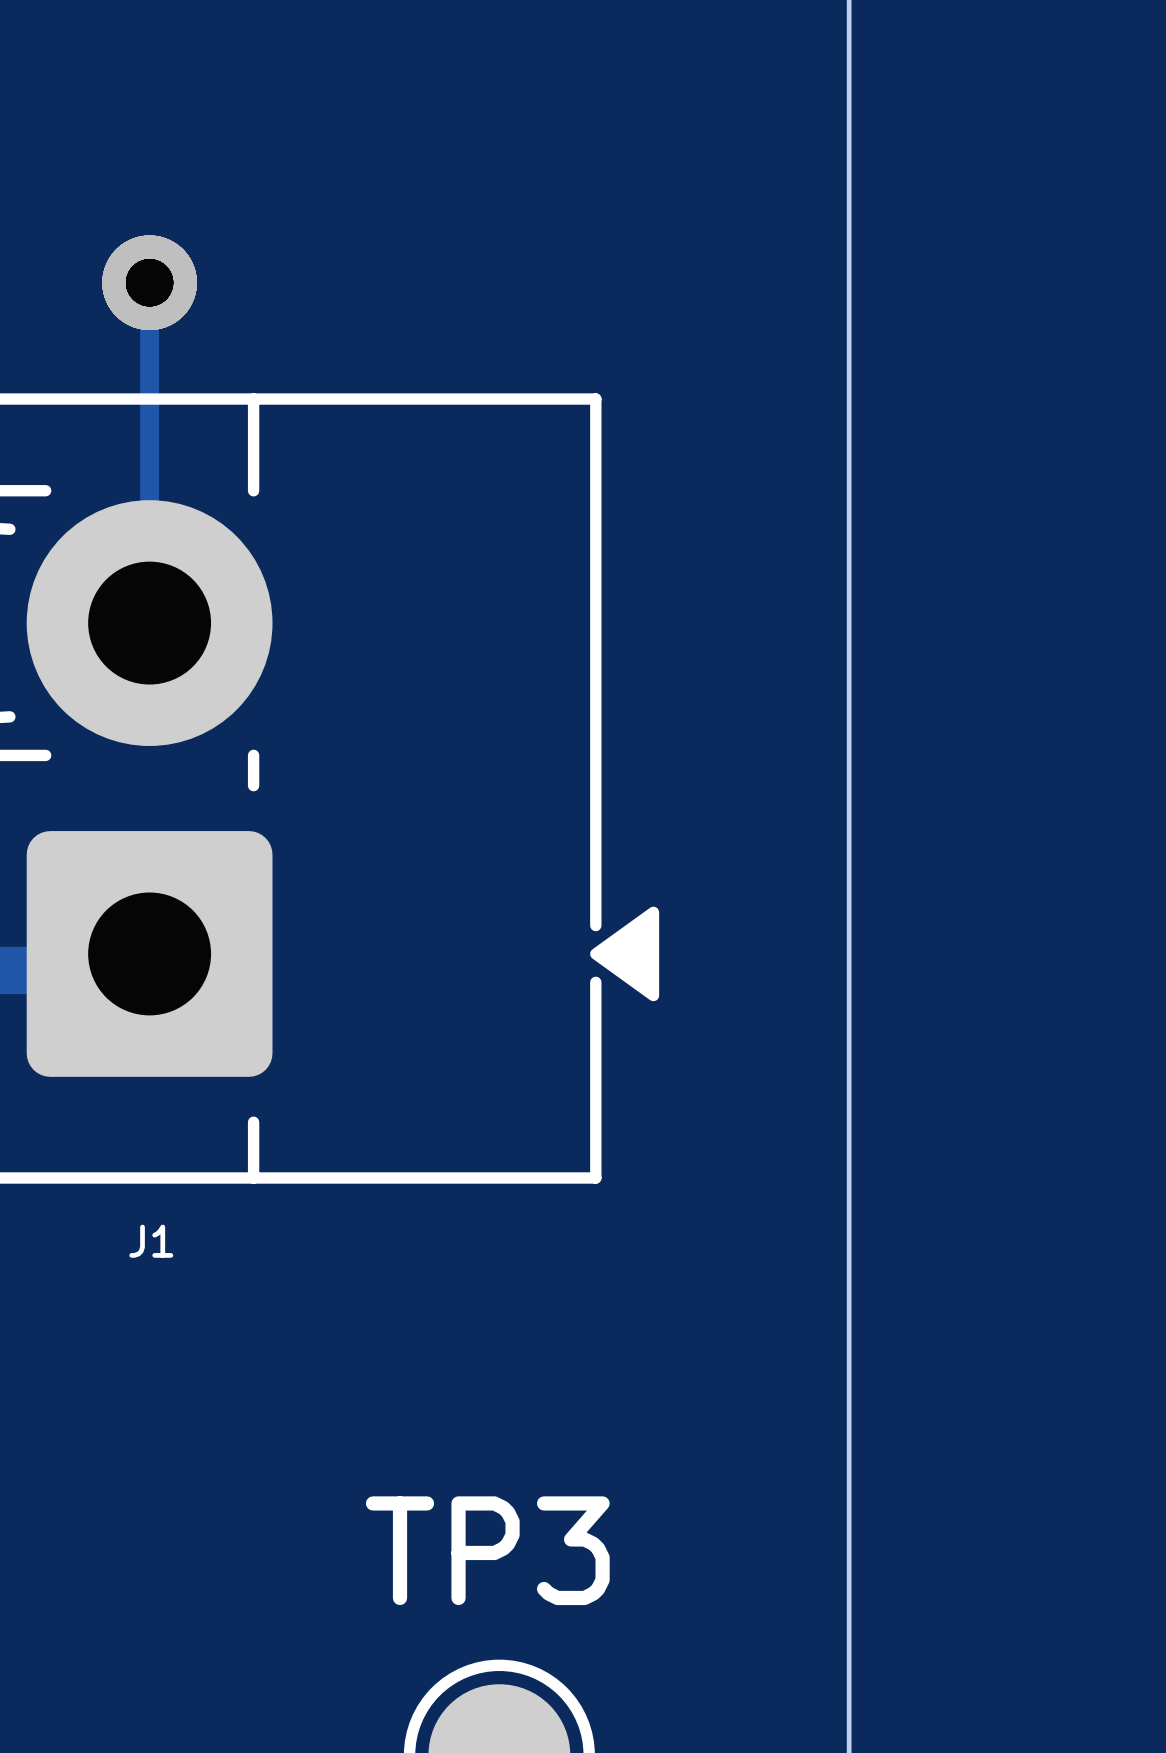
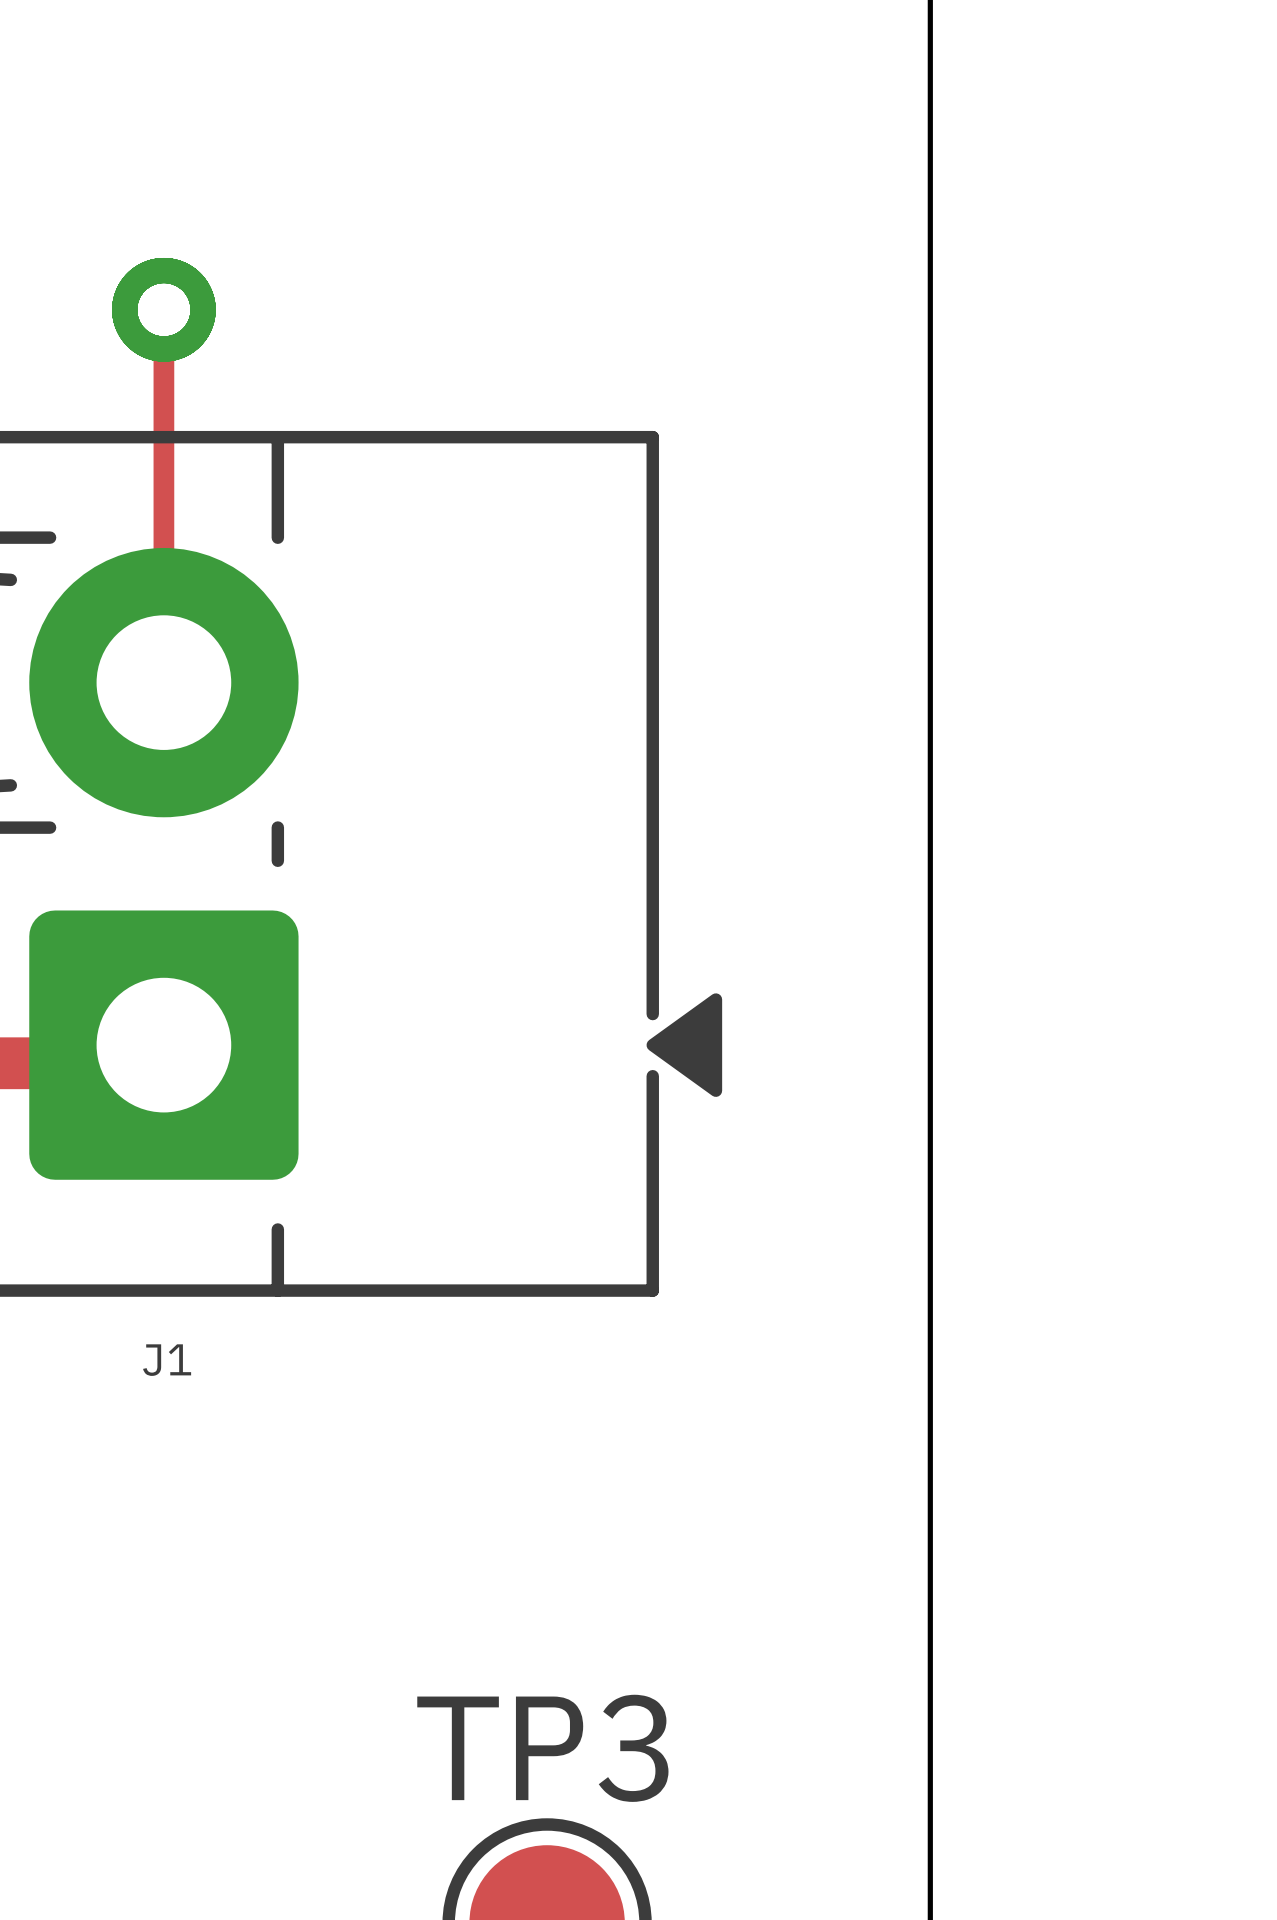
TP3 name position: TP3 (487, 1550) -> TP3 (542, 1748)

